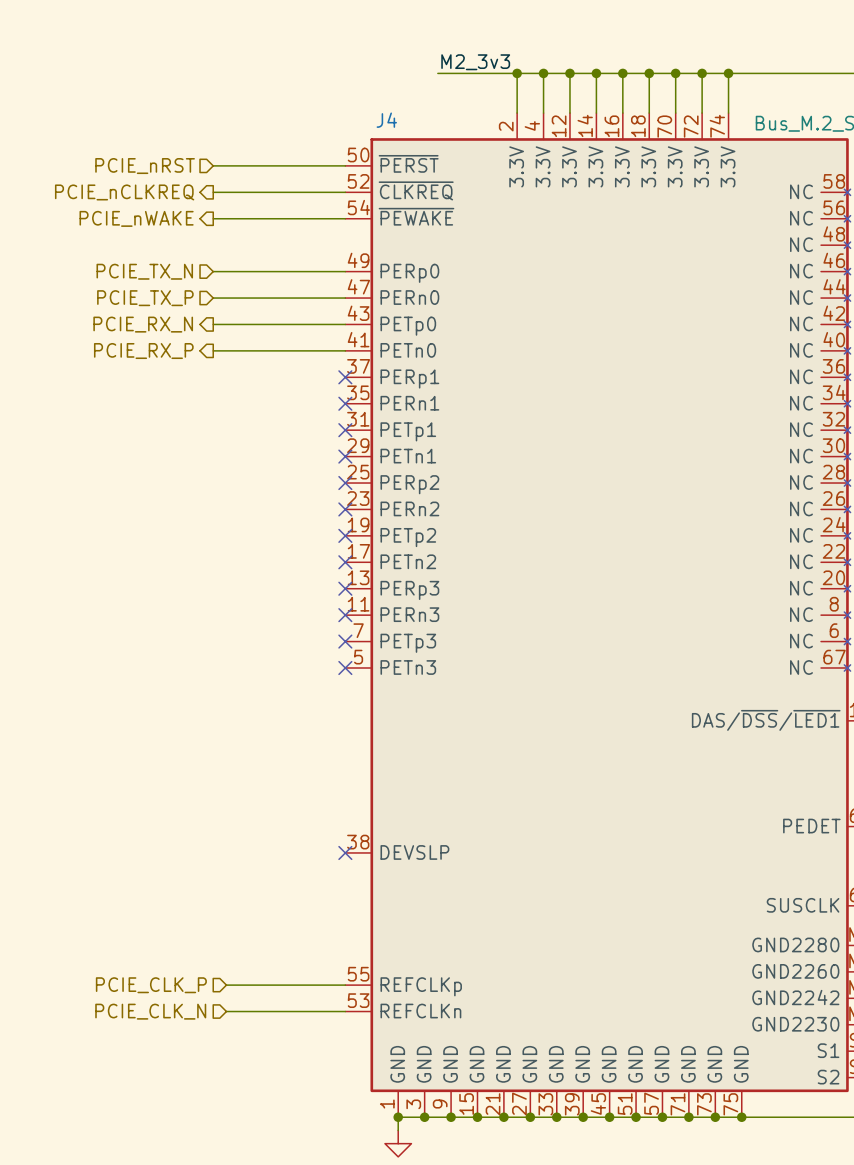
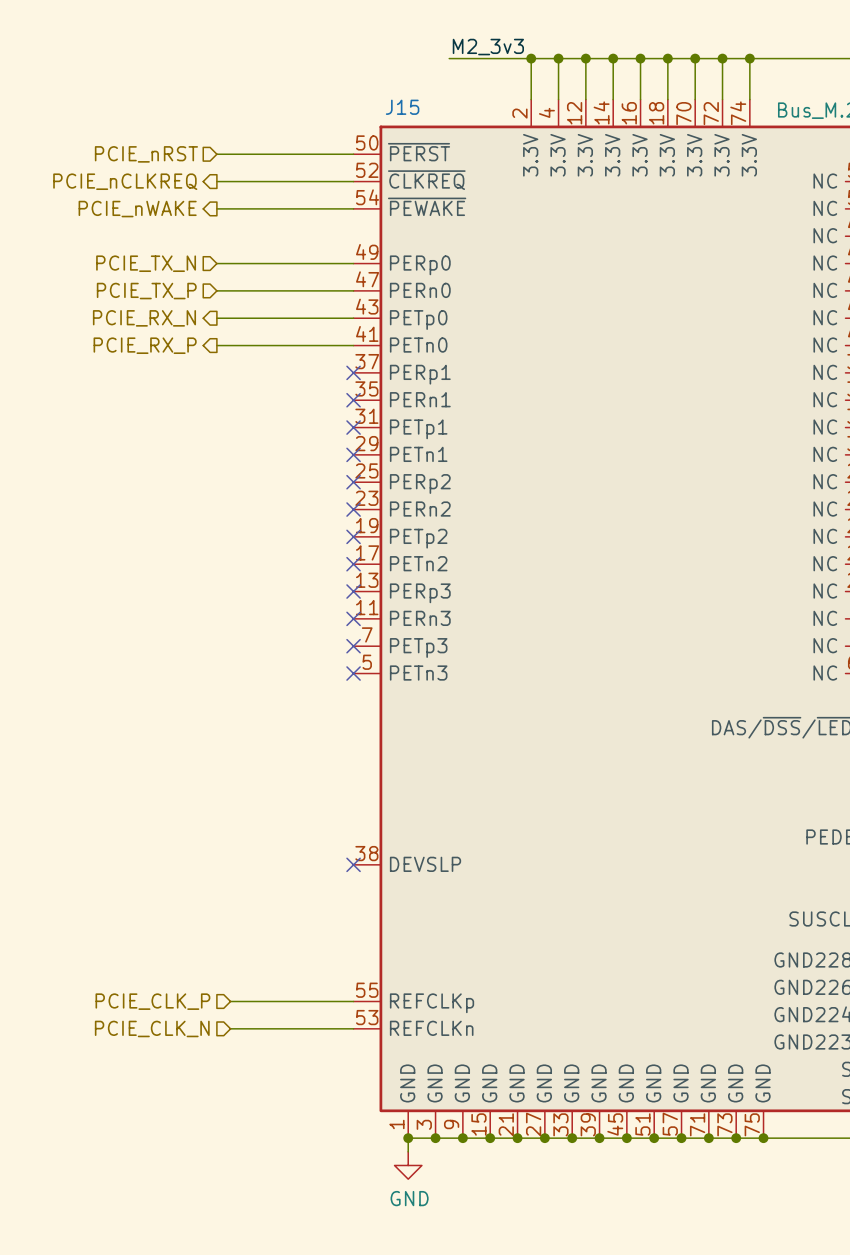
J4 name: J4 (386, 120) -> J15 (402, 107)

